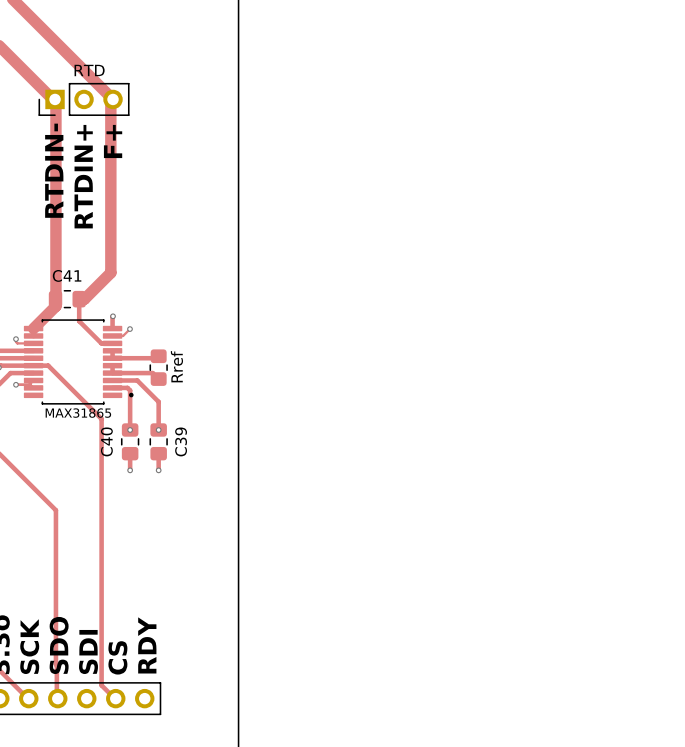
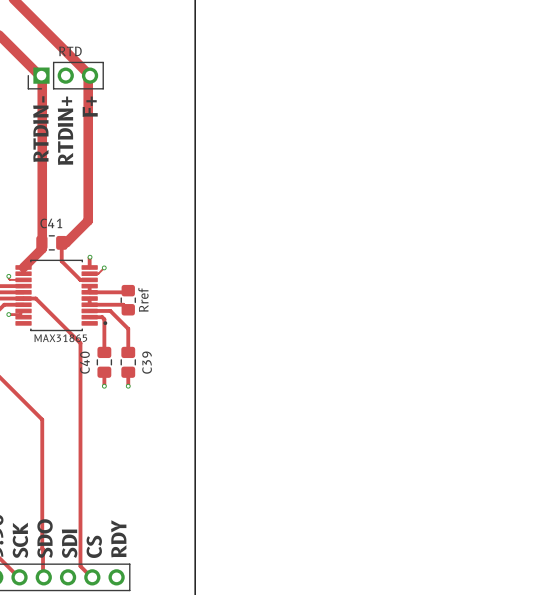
via: (130, 430) -> none
via: (158, 430) -> none

